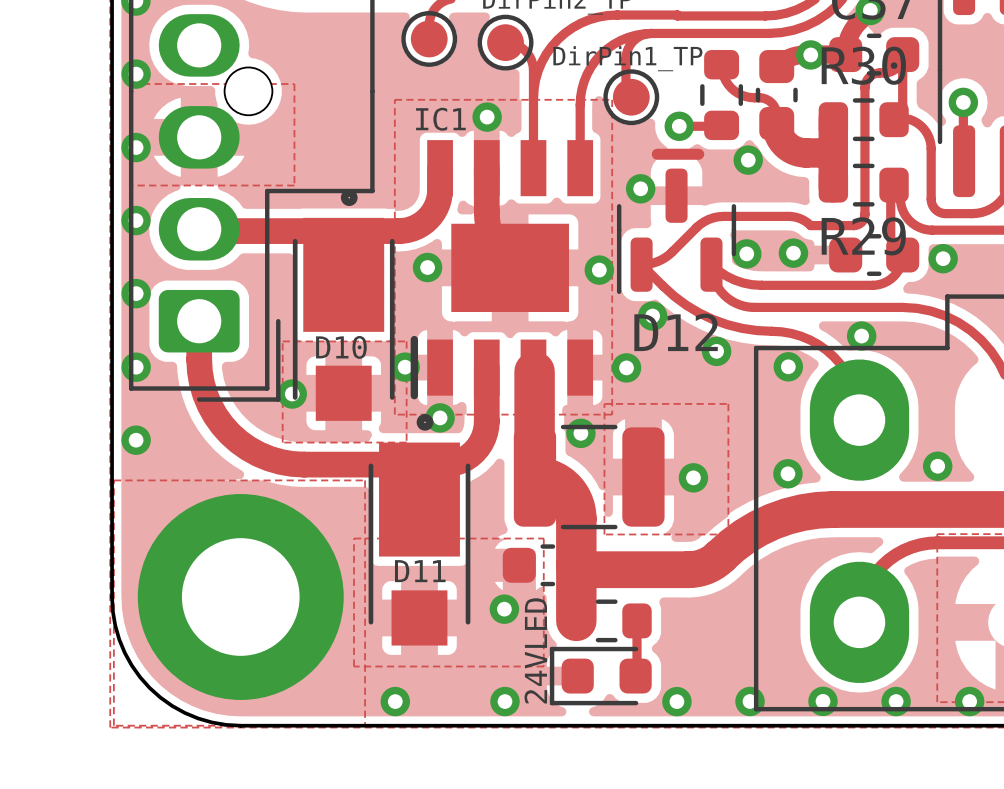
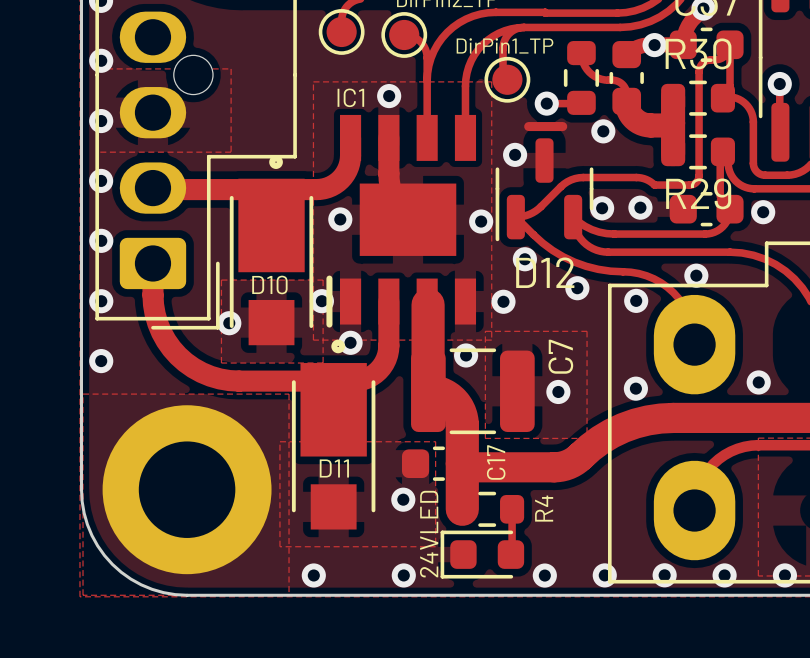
C7 name: none -> C7 (560, 356)
C17 name: none -> C17 (496, 462)
R4 name: none -> R4 (544, 508)

